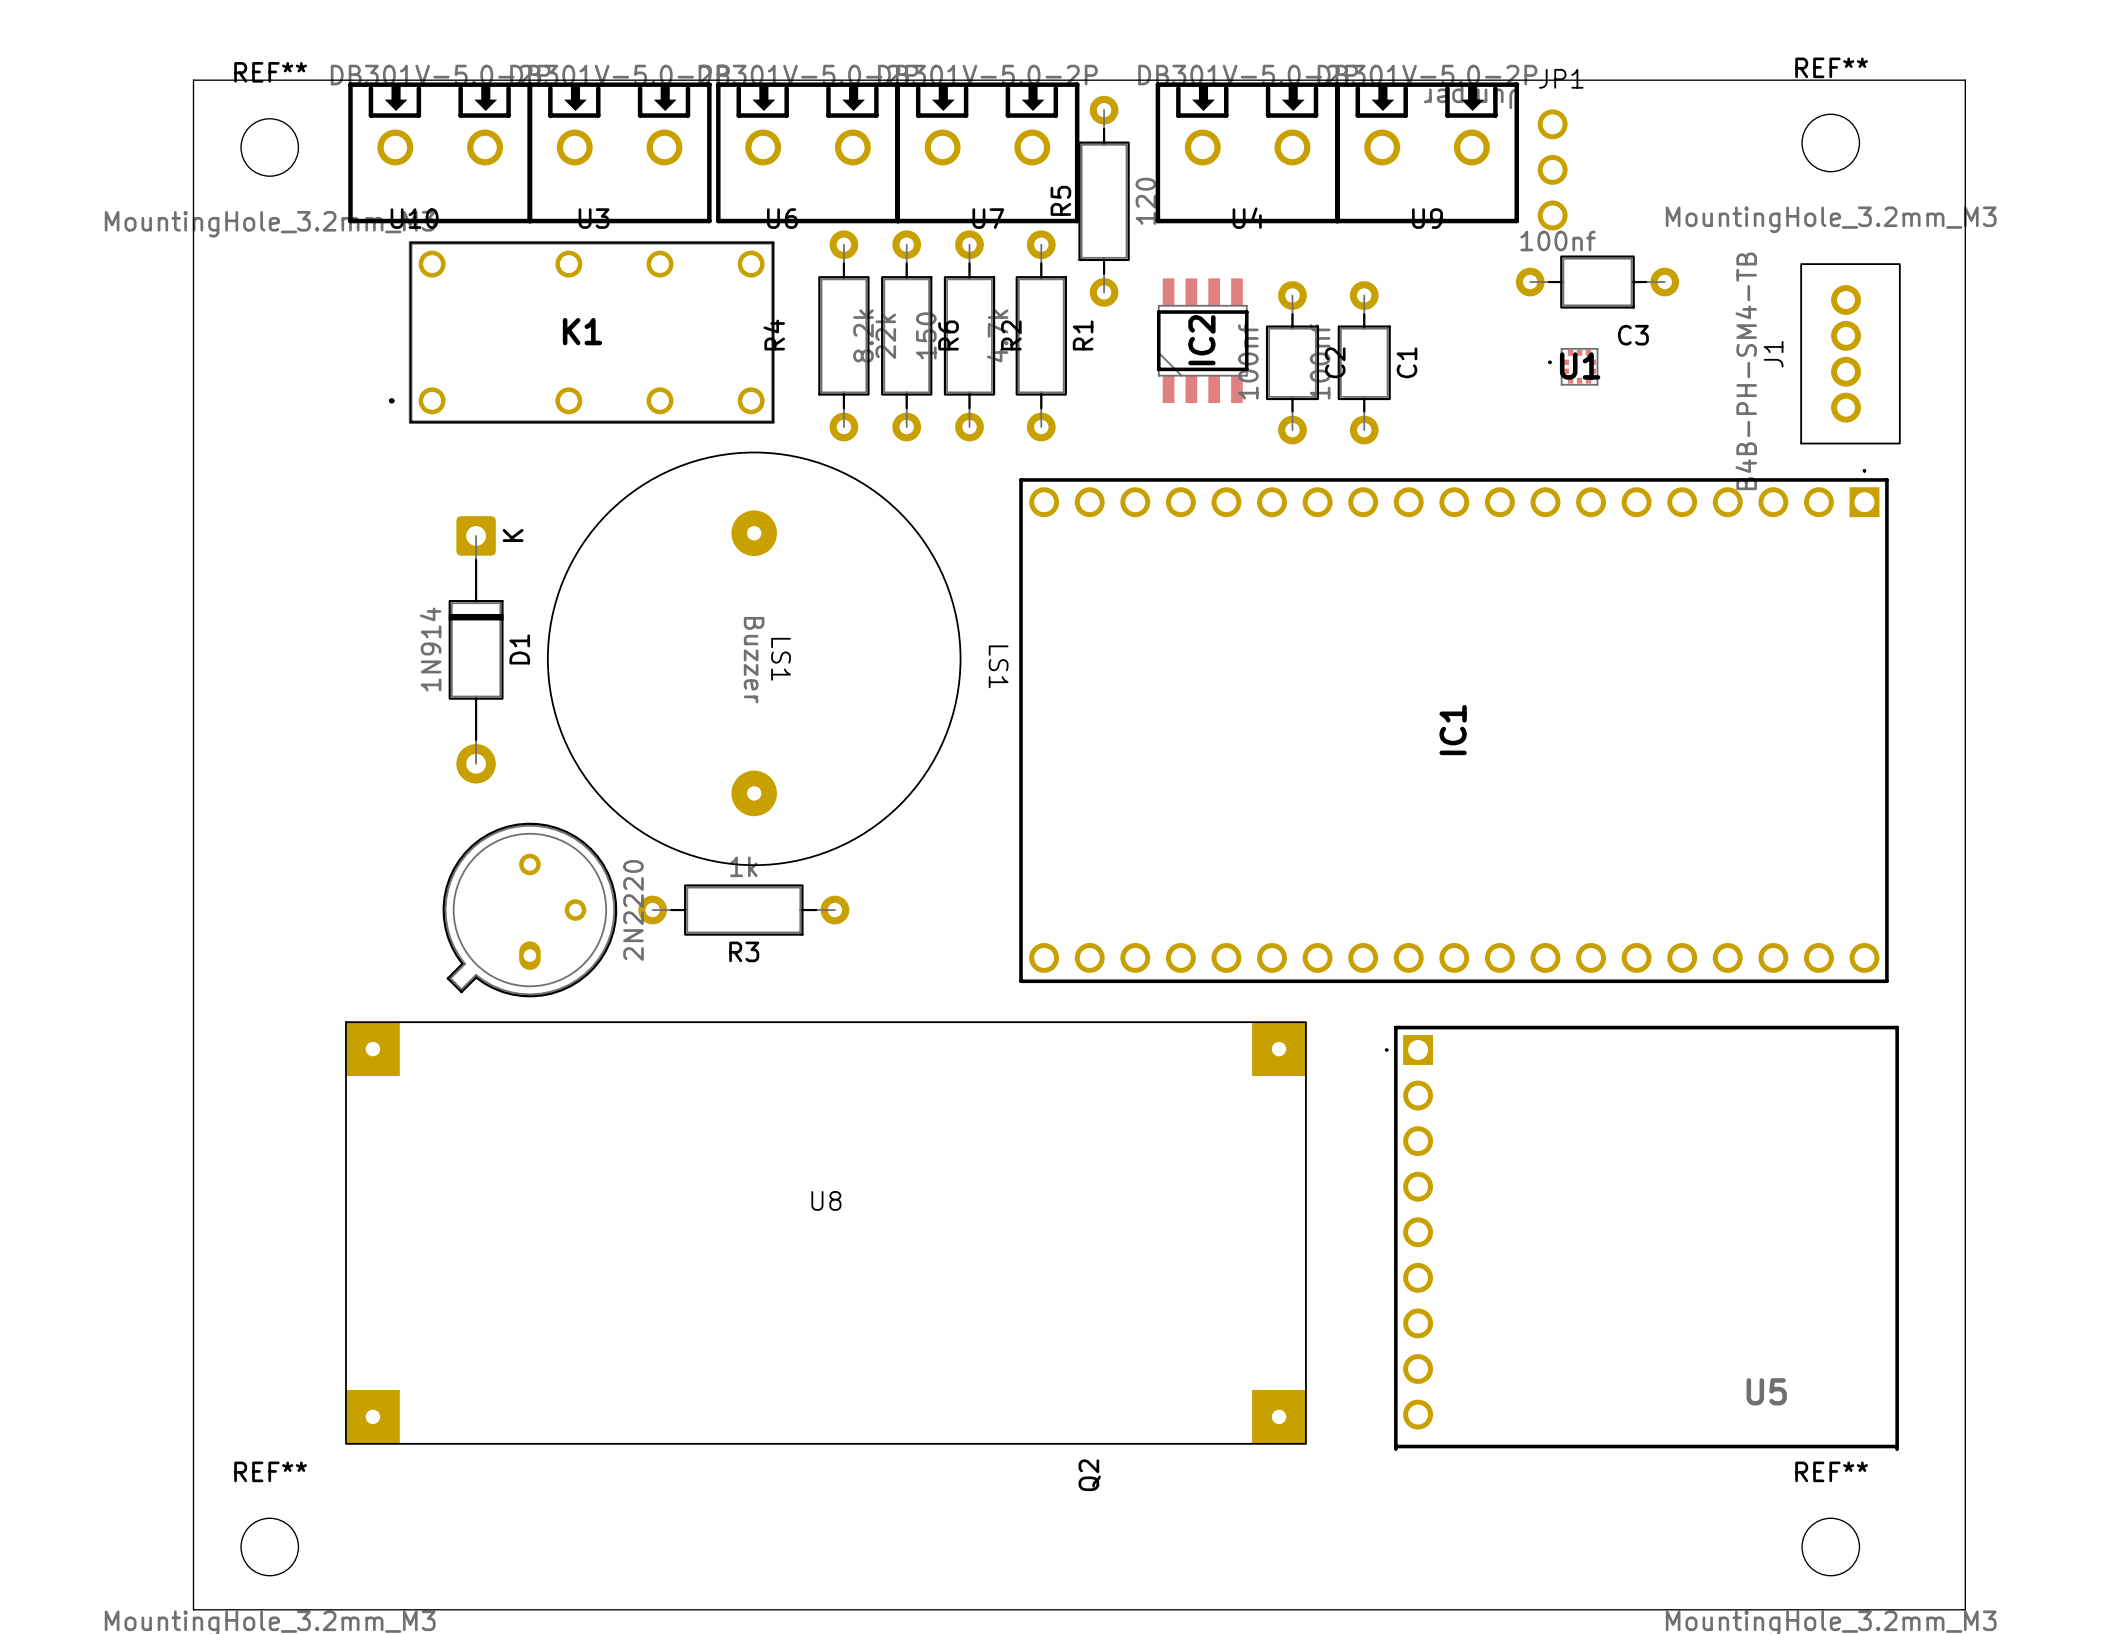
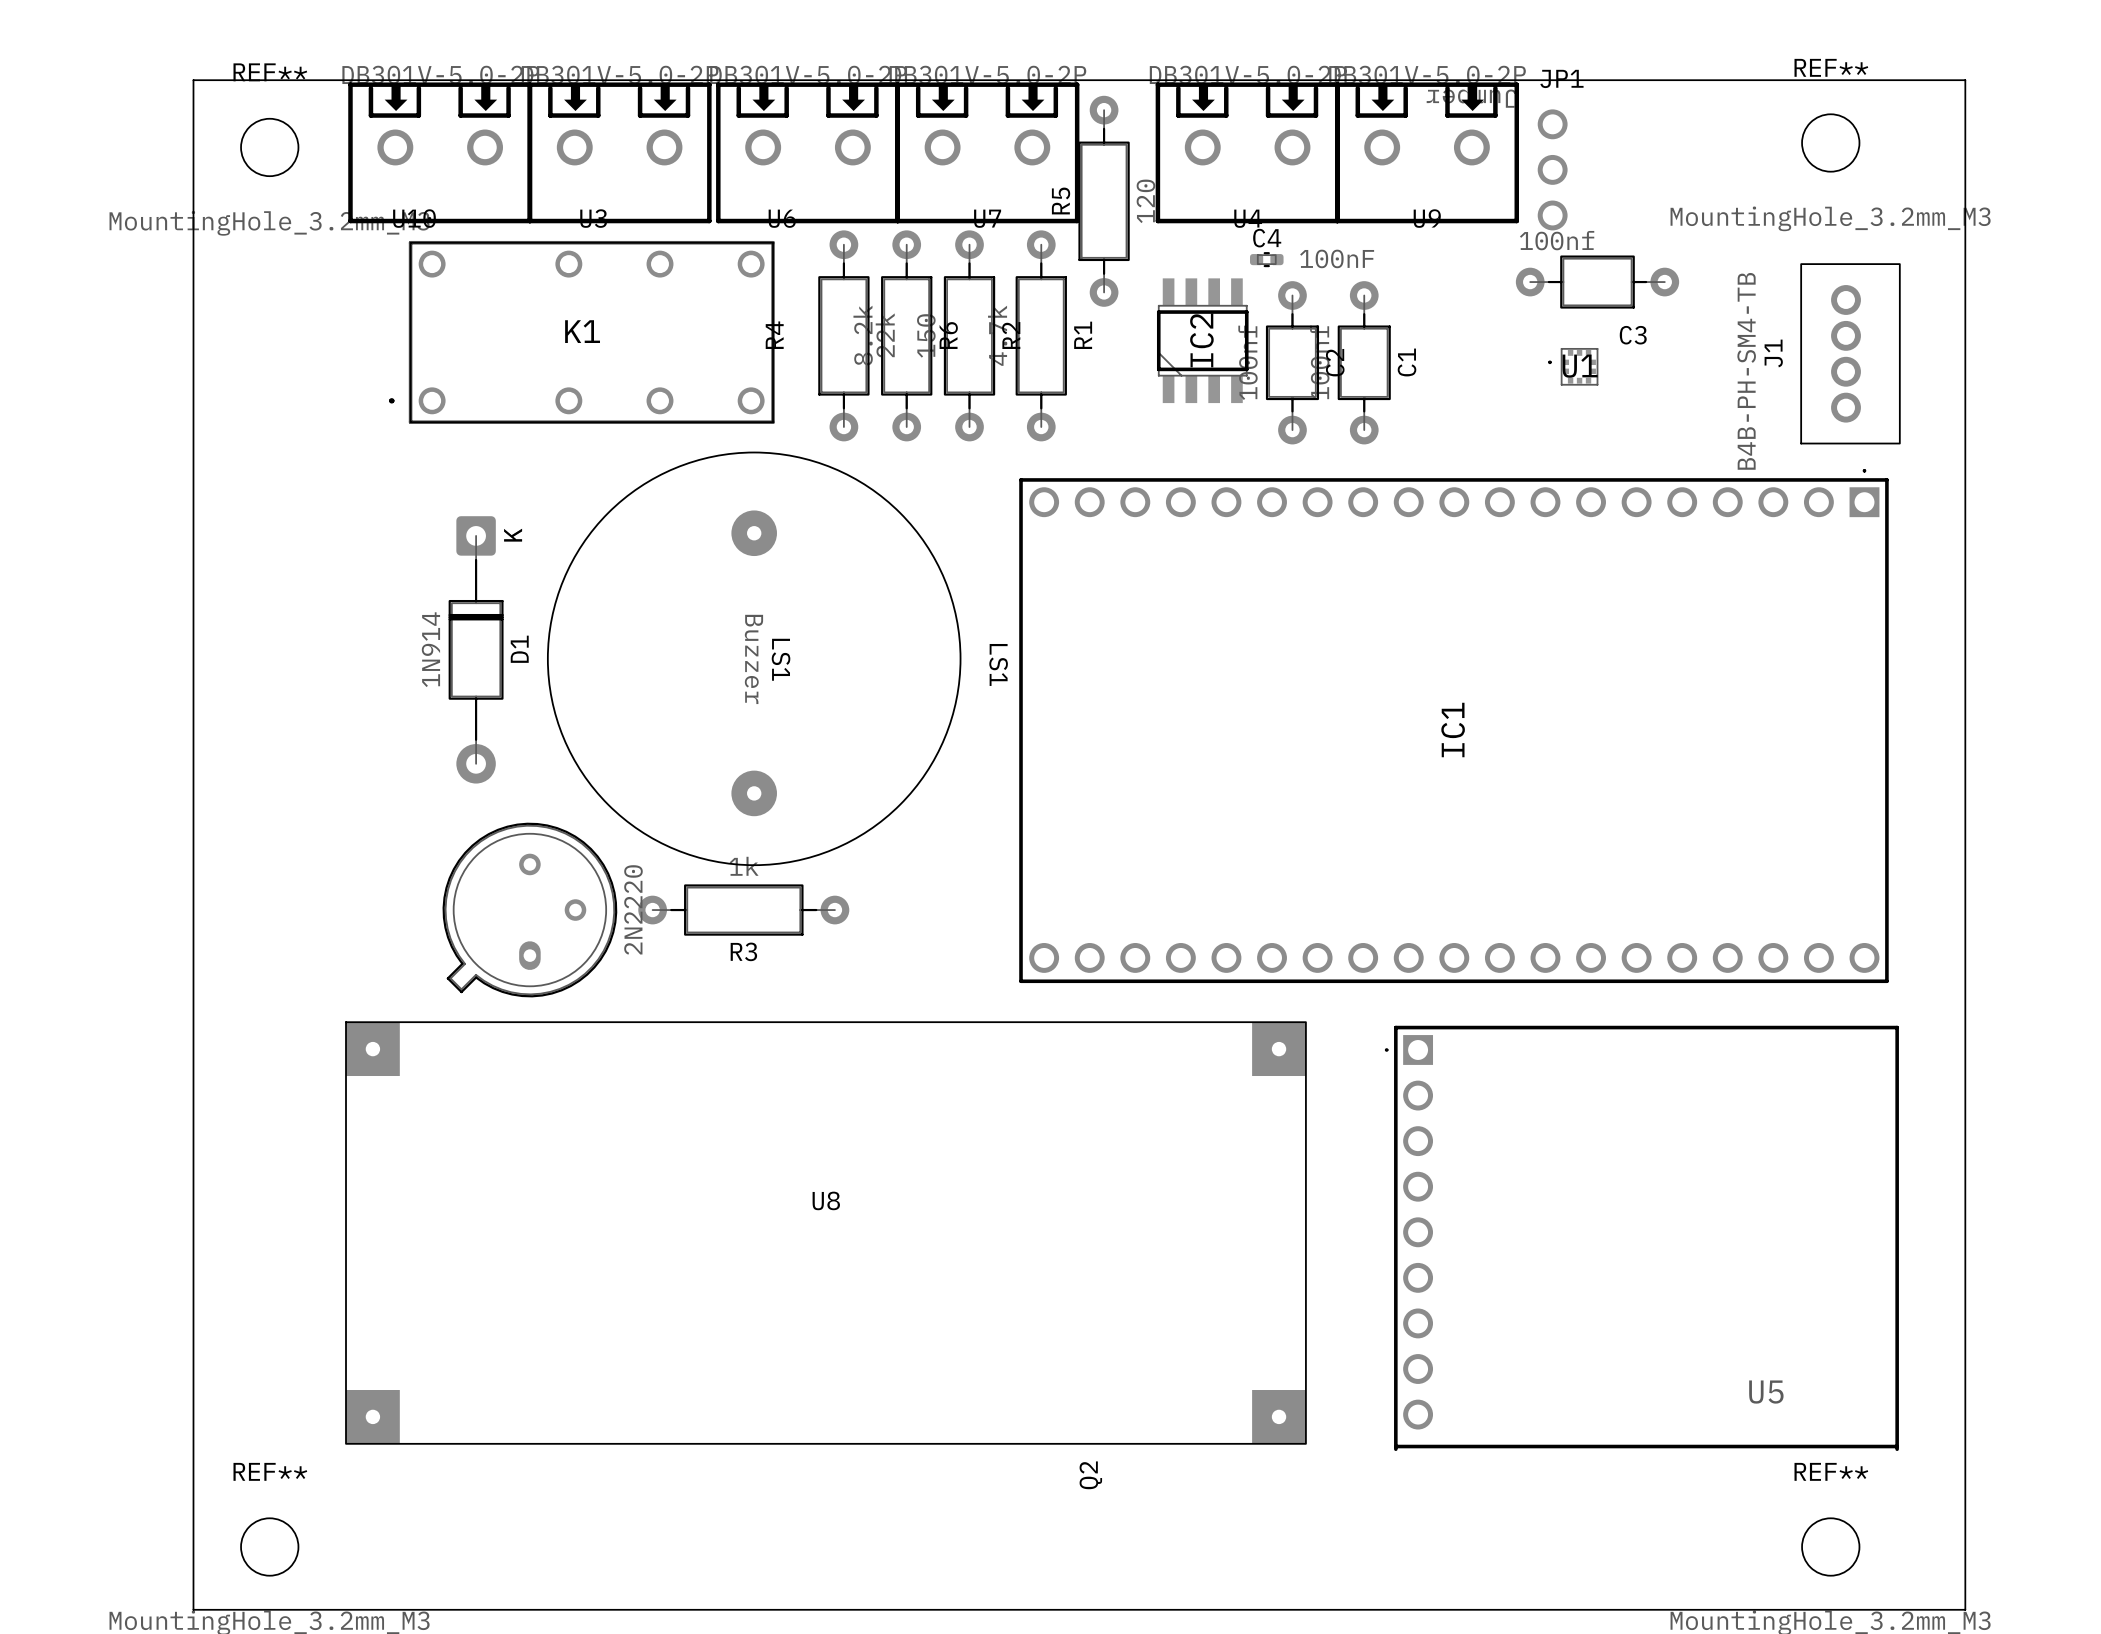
C4: none -> 100nF (1266, 259)

